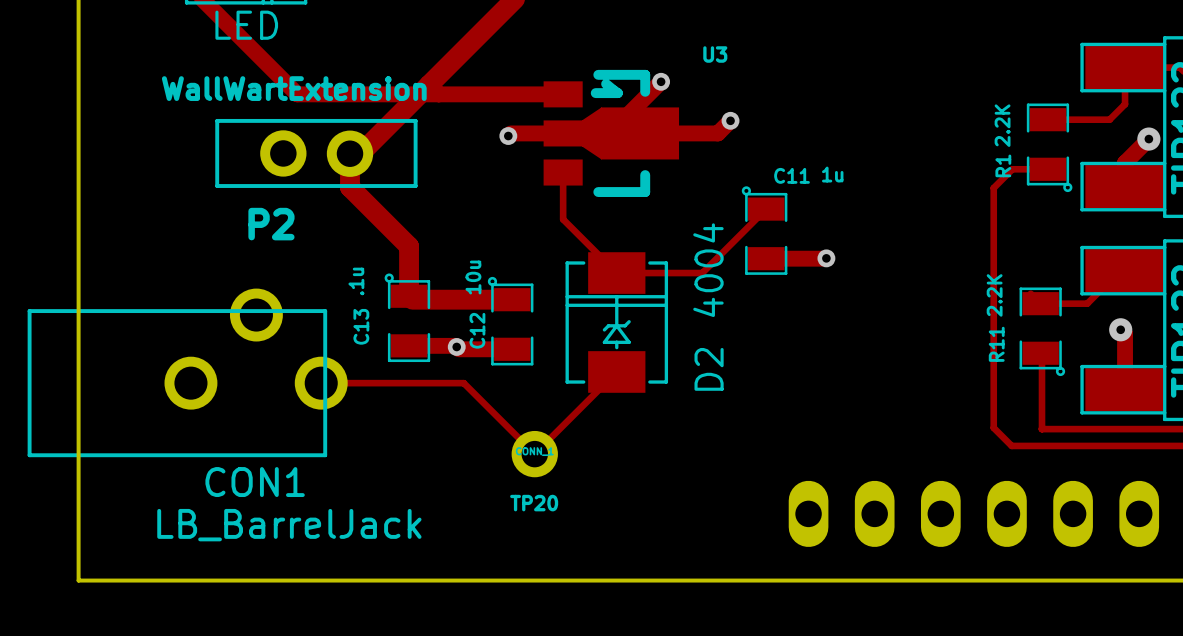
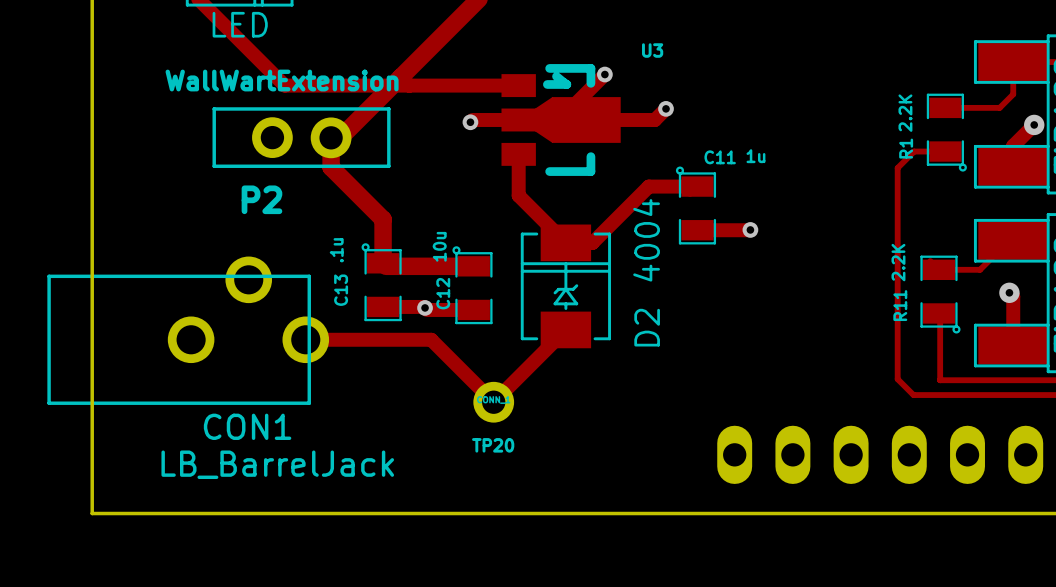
track width: thin (563, 172) (563, 219) (616, 273) (647, 273) -> thick (518, 154) (518, 195) (565, 242) (592, 242)
track: (757, 217) (702, 273) (647, 273) -> (697, 186) (648, 186) (592, 242)
track width: thin (616, 371) (534, 453) (463, 383) (321, 383) -> thick (565, 329) (493, 402) (431, 339) (305, 339)

